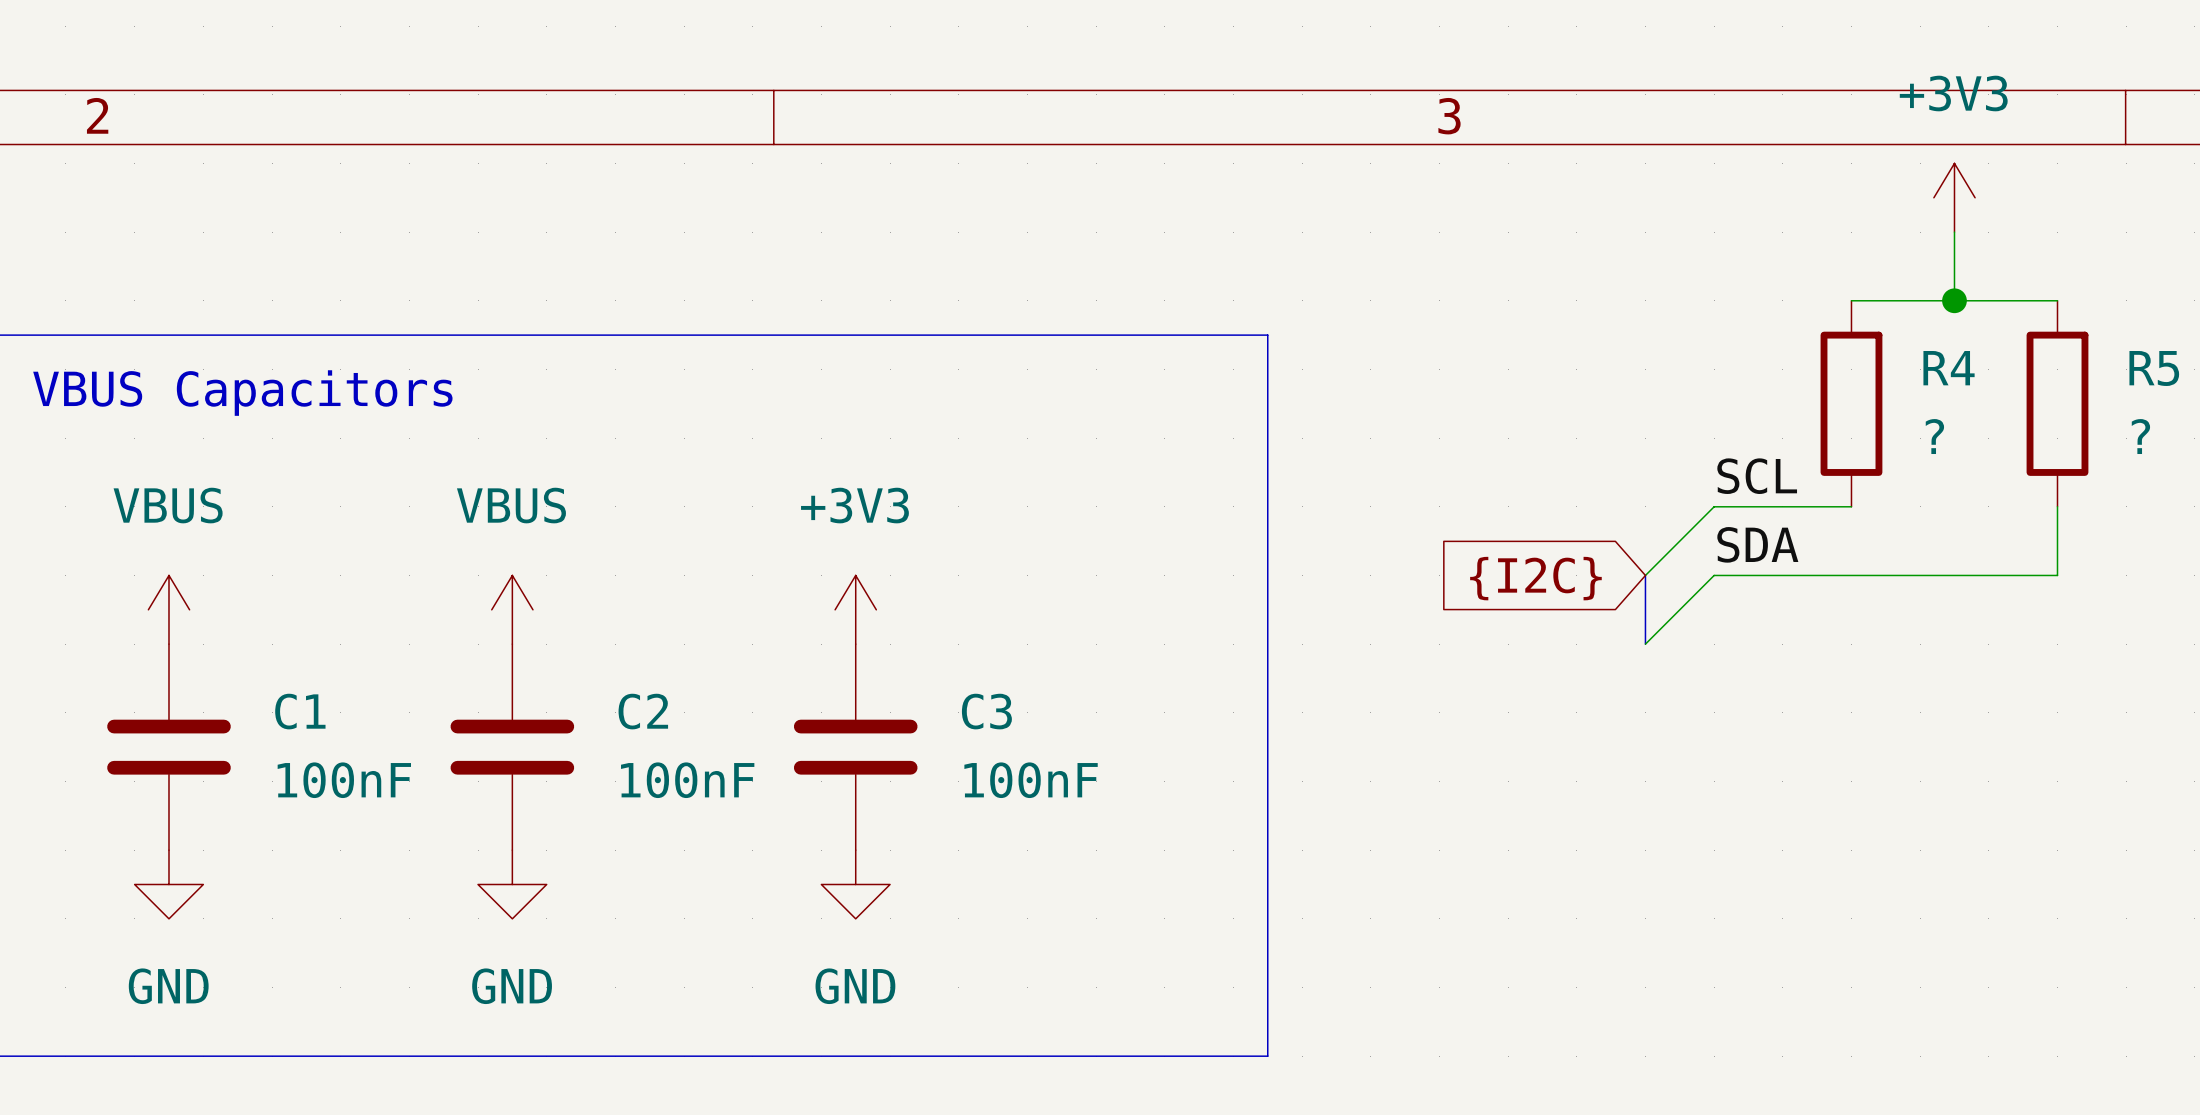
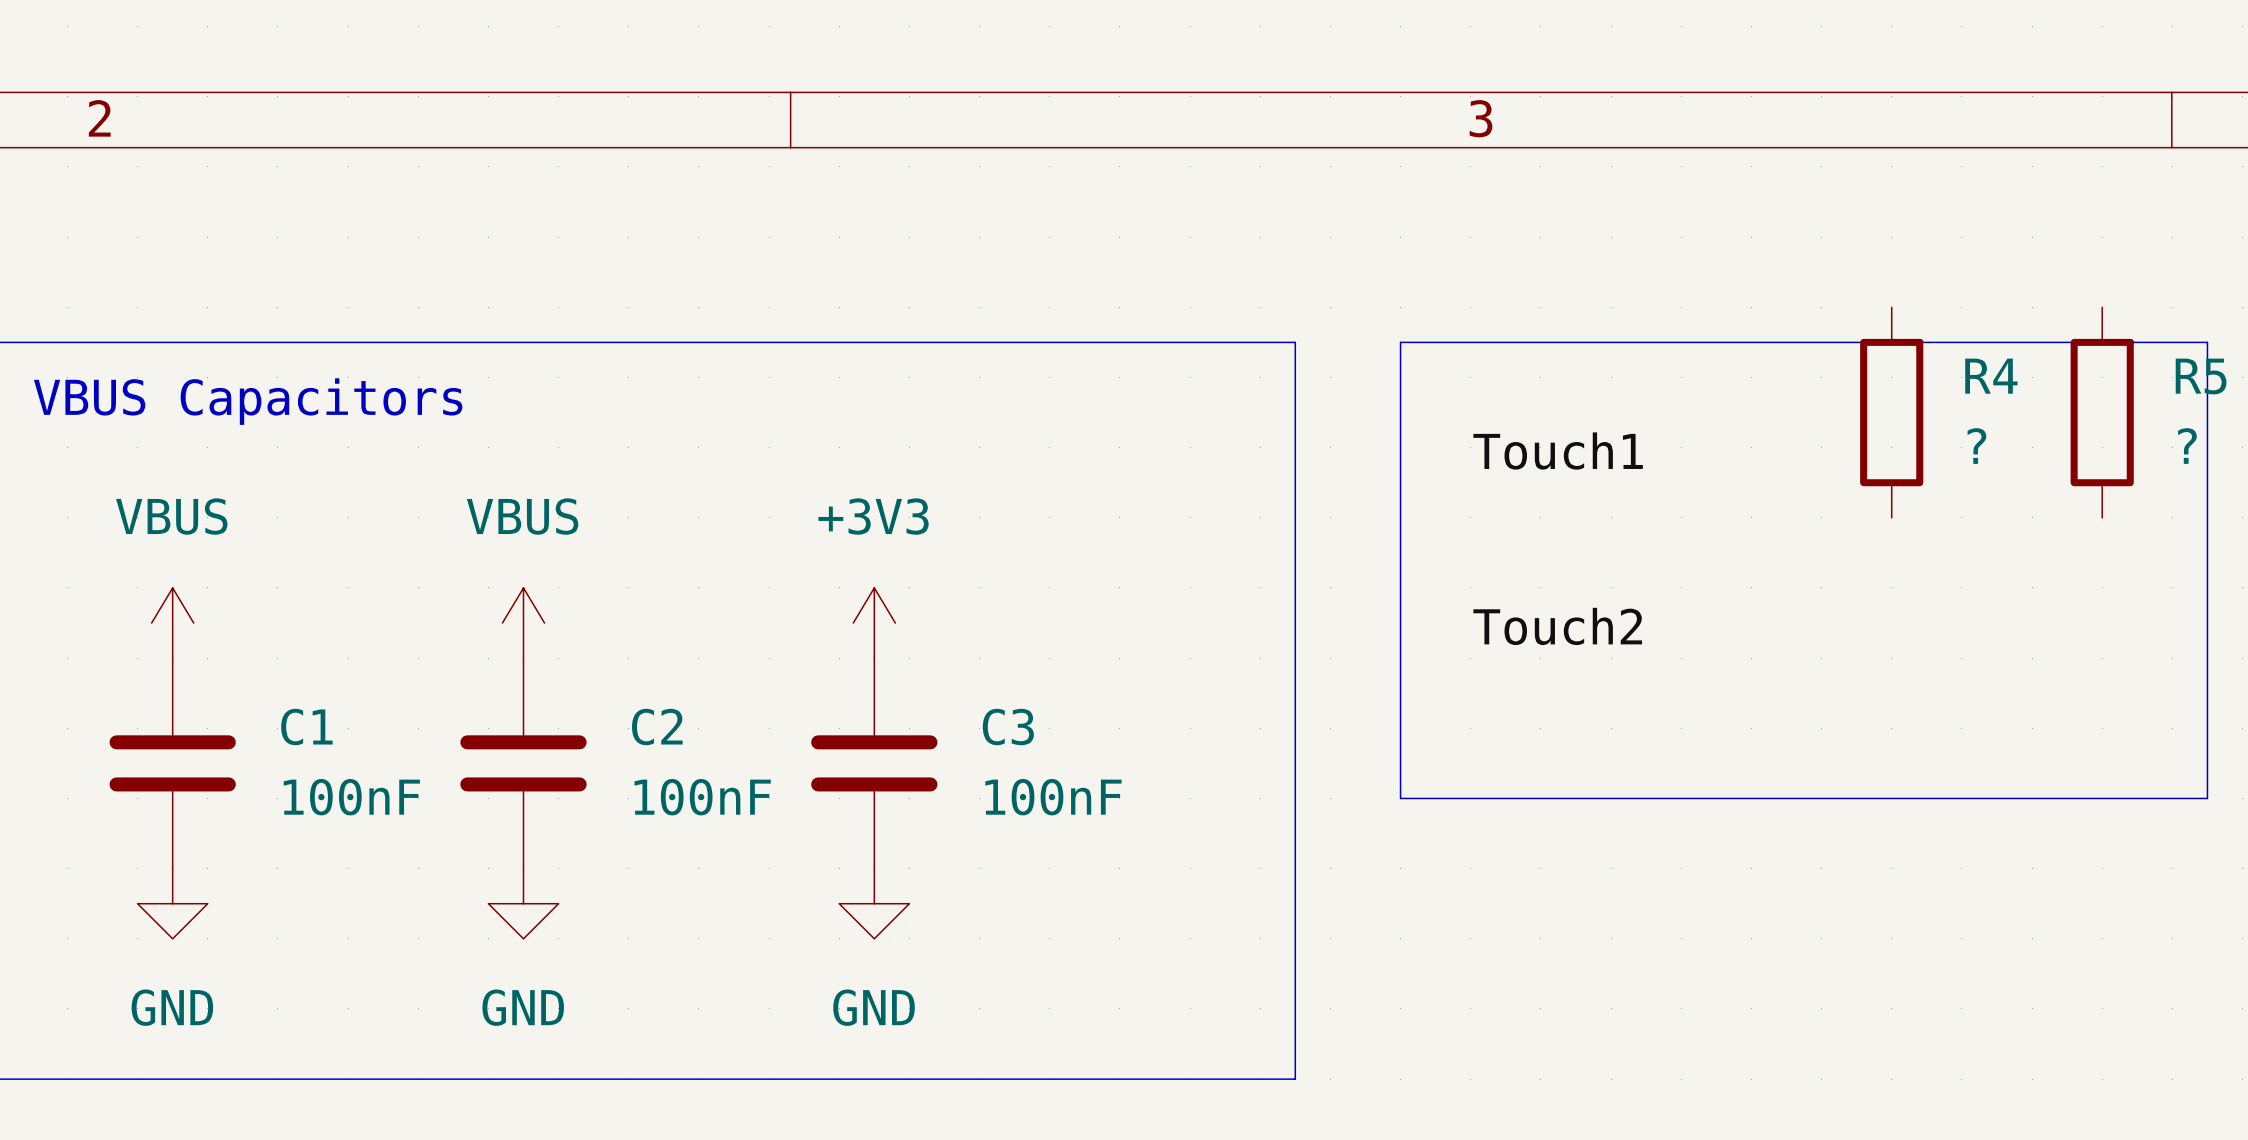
power symbol: +3V3 (1954, 197) -> none
wire: (1954, 232) (1954, 300) -> none
wire: (1851, 300) (2057, 300) -> none
junction: (1954, 300) -> none
line: none -> (1400, 342) (2207, 342) (2207, 798) (1400, 798) (1400, 342)
label: none -> Touch1 (1558, 451)
label: SCL (1757, 476) -> none
wire: (1851, 506) (1714, 506) (1645, 575) -> none
wire: (2057, 506) (2057, 575) (1714, 575) (1645, 644) -> none
label: SDA (1757, 544) -> none
bus: (1645, 575) (1645, 644) -> none
global label: {I2C} (1535, 578) -> none
label: none -> Touch2 (1557, 626)

